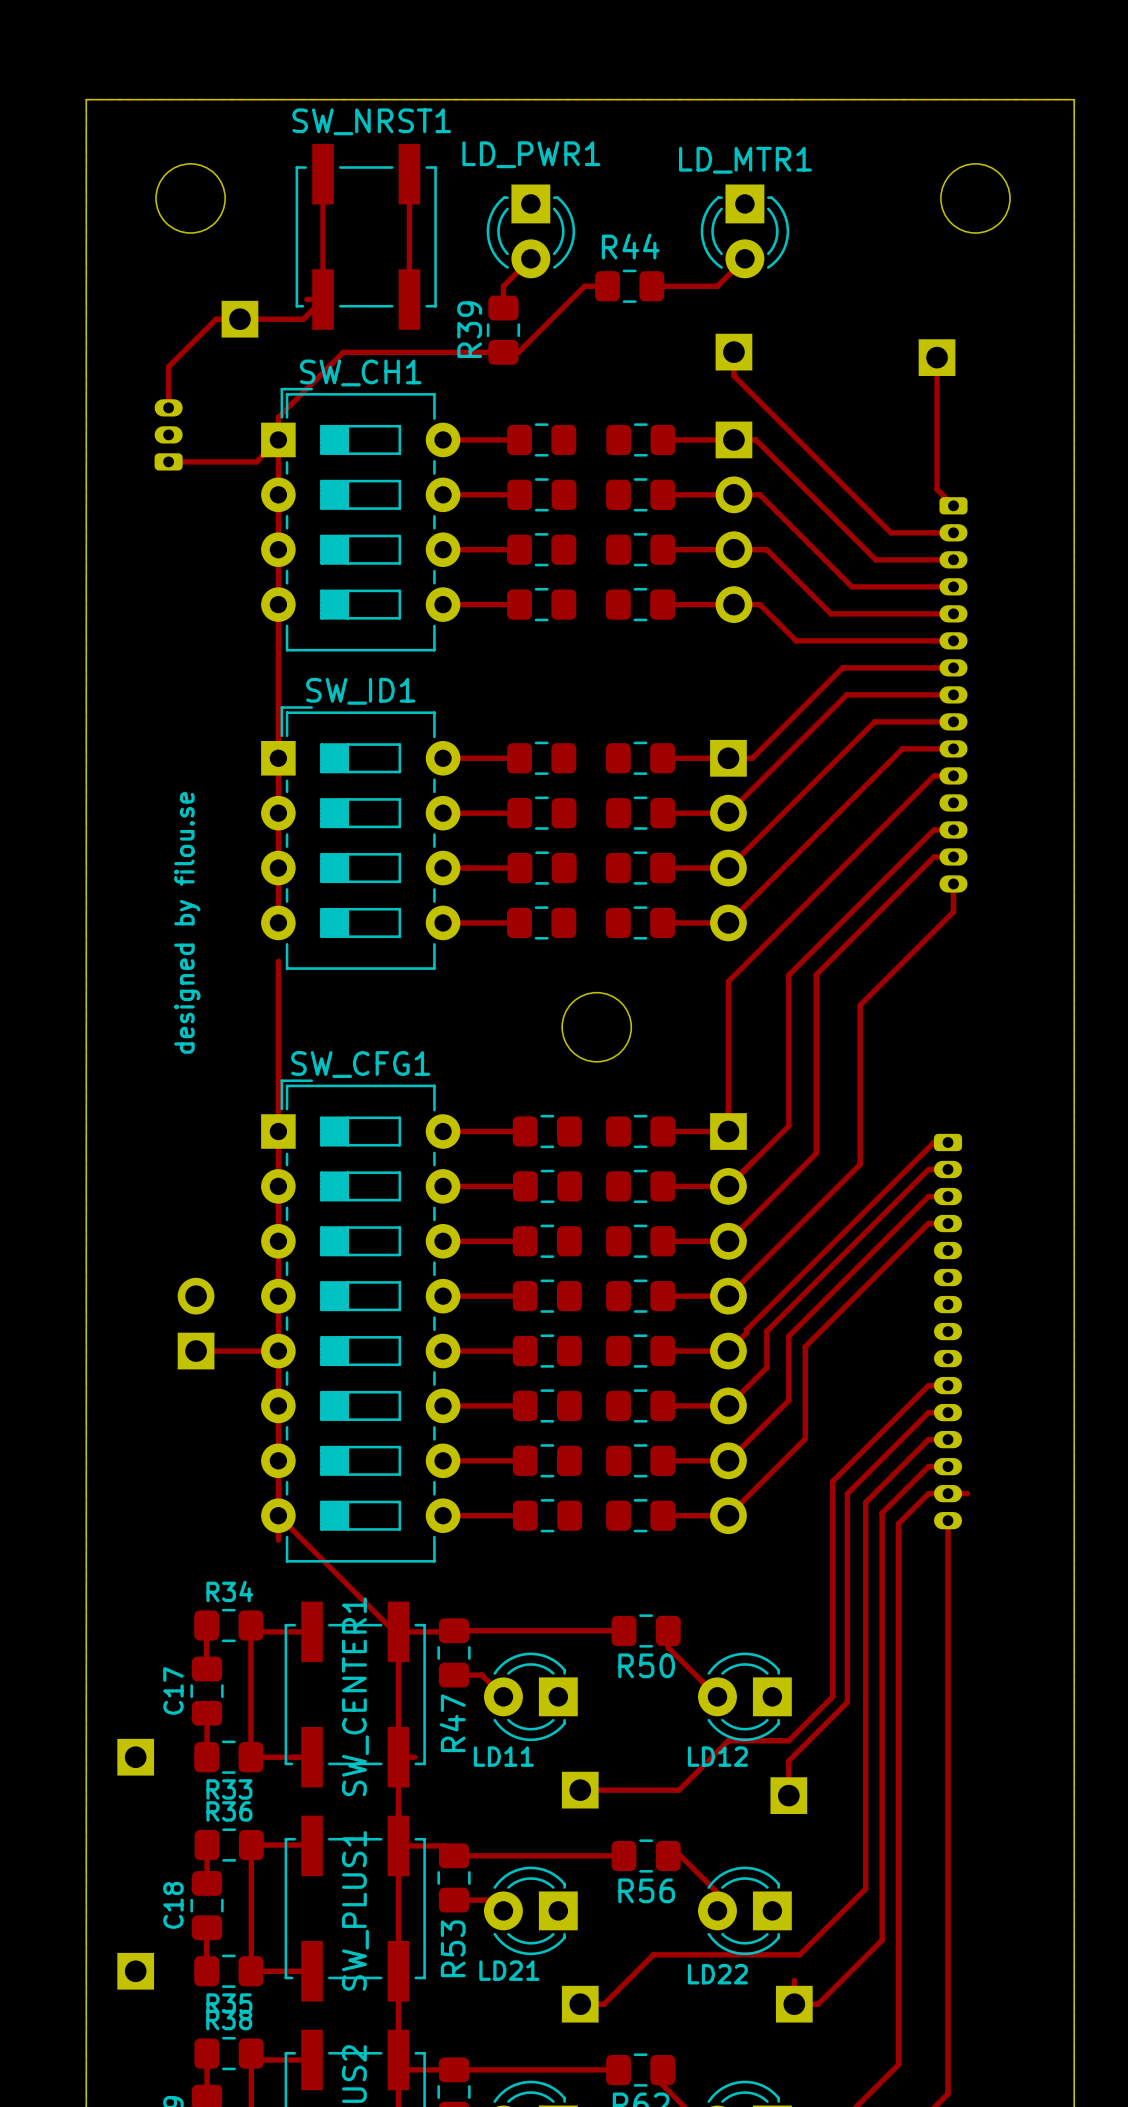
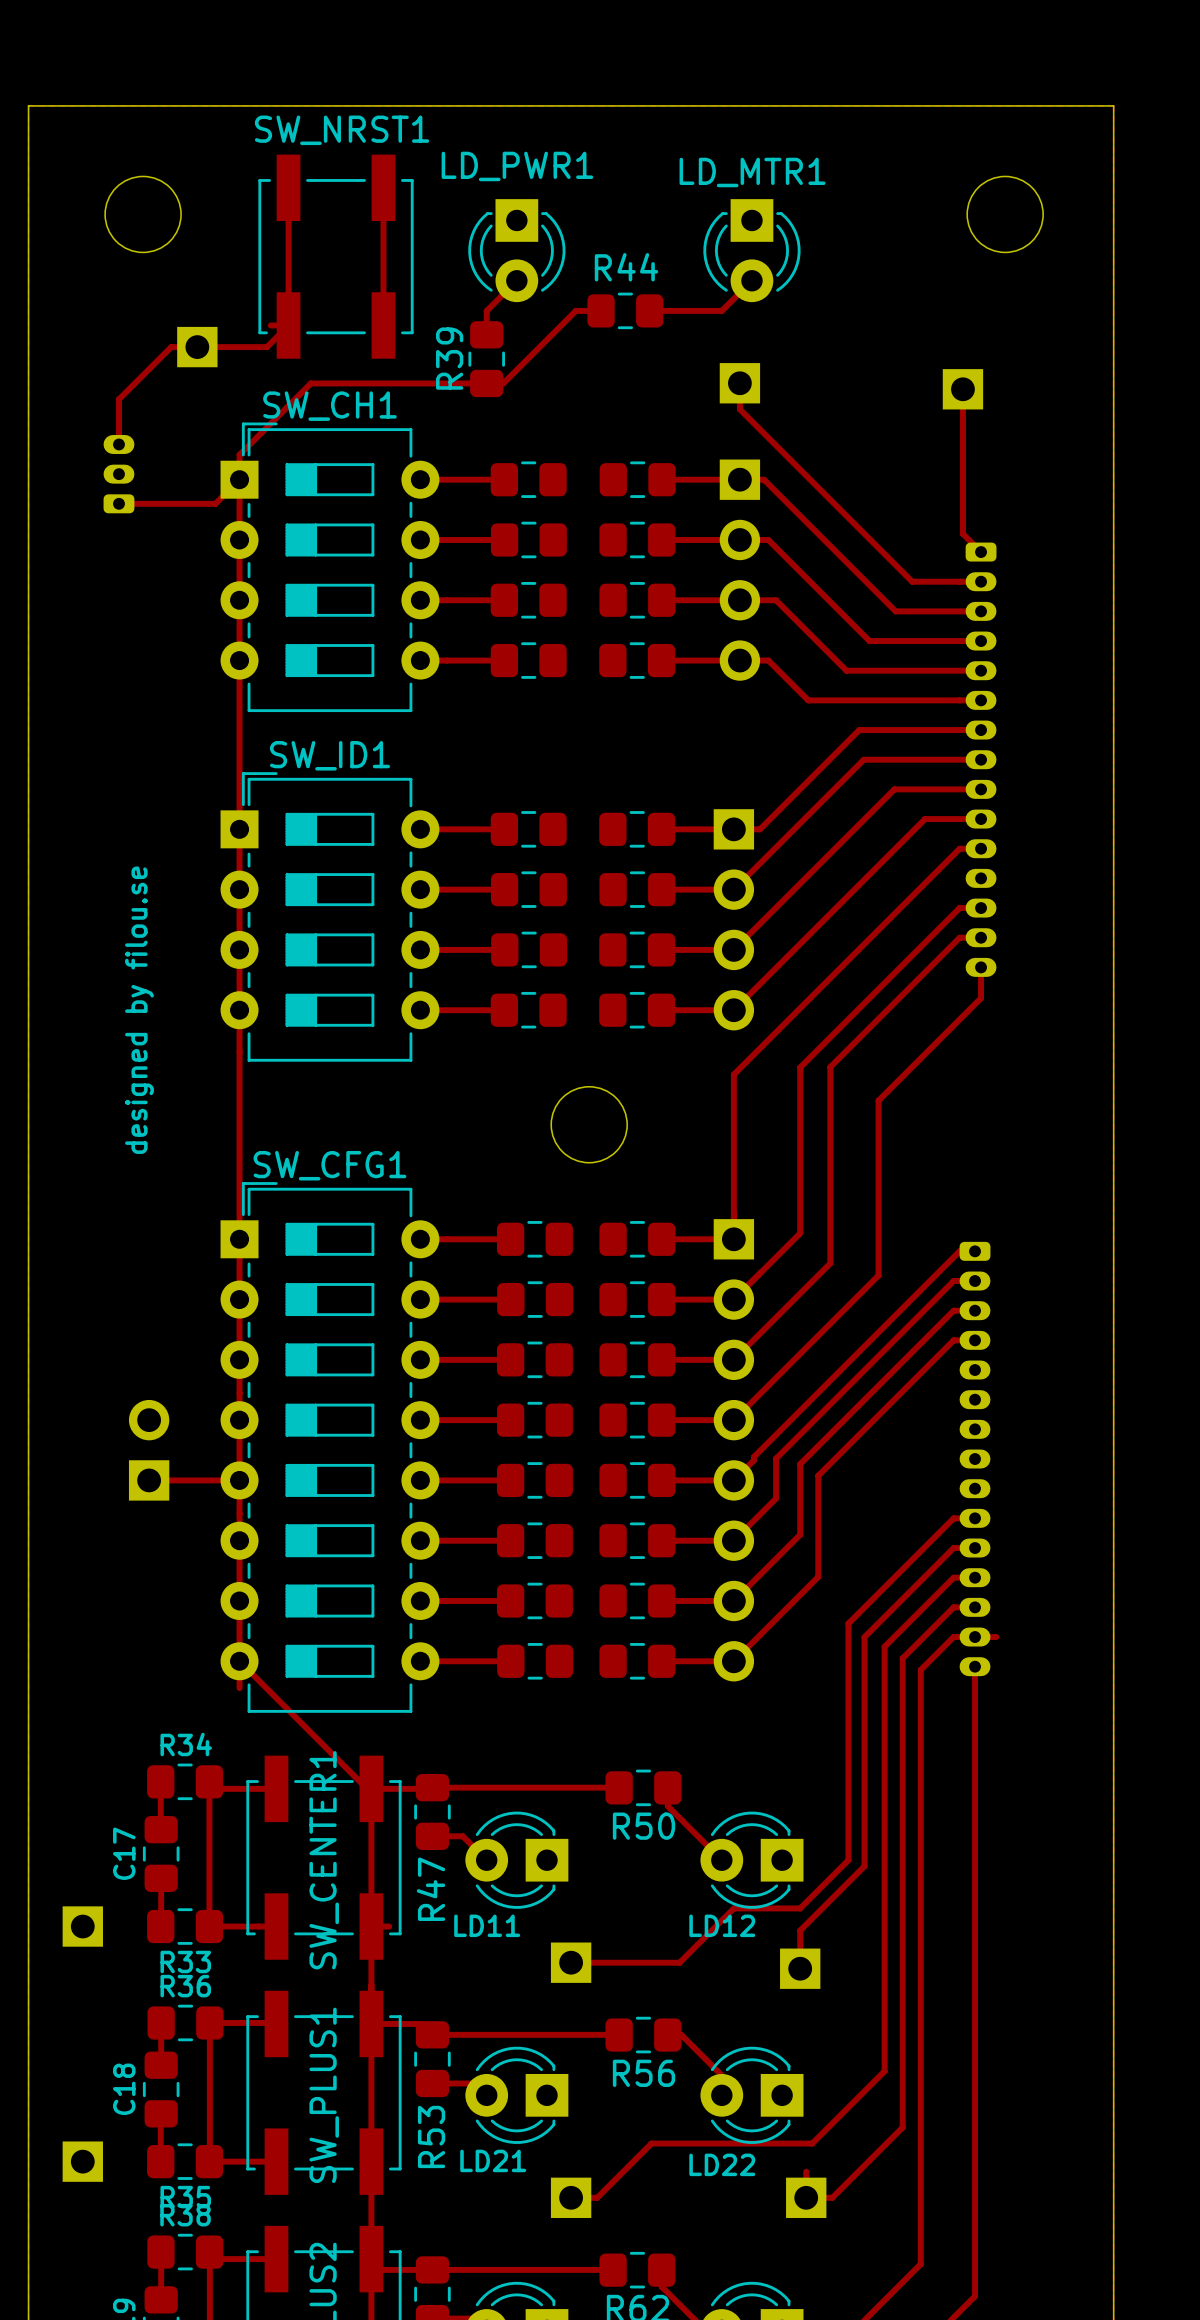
track: none -> (239, 1010) (239, 1052)

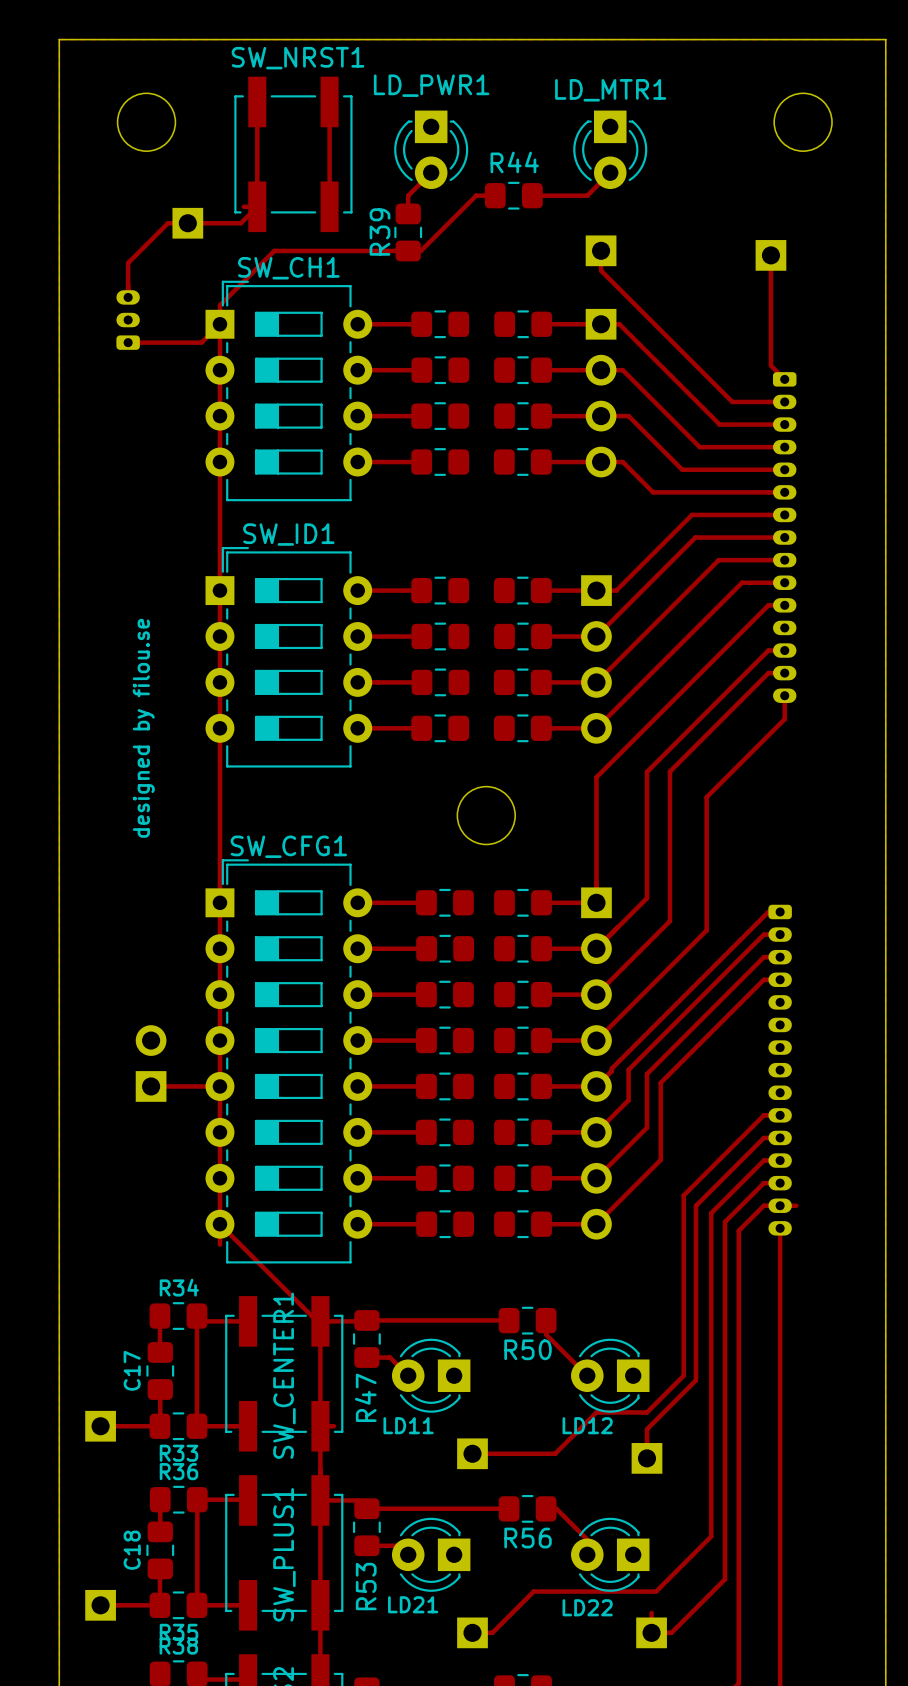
track: none -> (100, 1426) (159, 1426)
track: none -> (100, 1605) (159, 1605)

